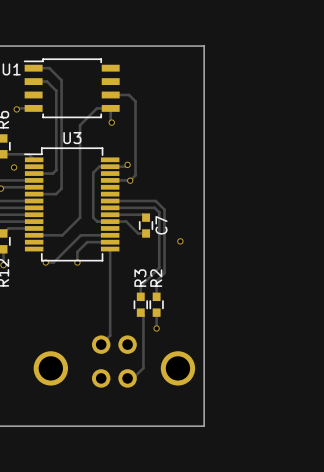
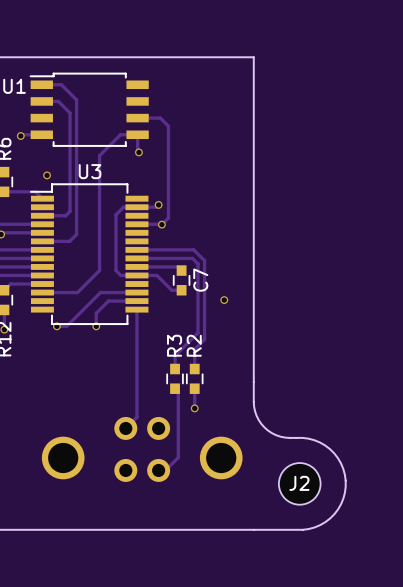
via position: (14, 167) -> (47, 175)
board edge: (204, 323) (204, 426) -> (253, 401) (258, 419) (271, 433) (285, 437) (314, 440) (329, 449) (340, 463) (344, 474) (345, 486) (343, 498) (338, 509) (330, 518) (320, 525) (303, 529) (253, 529)
J2: none -> (299, 483)

